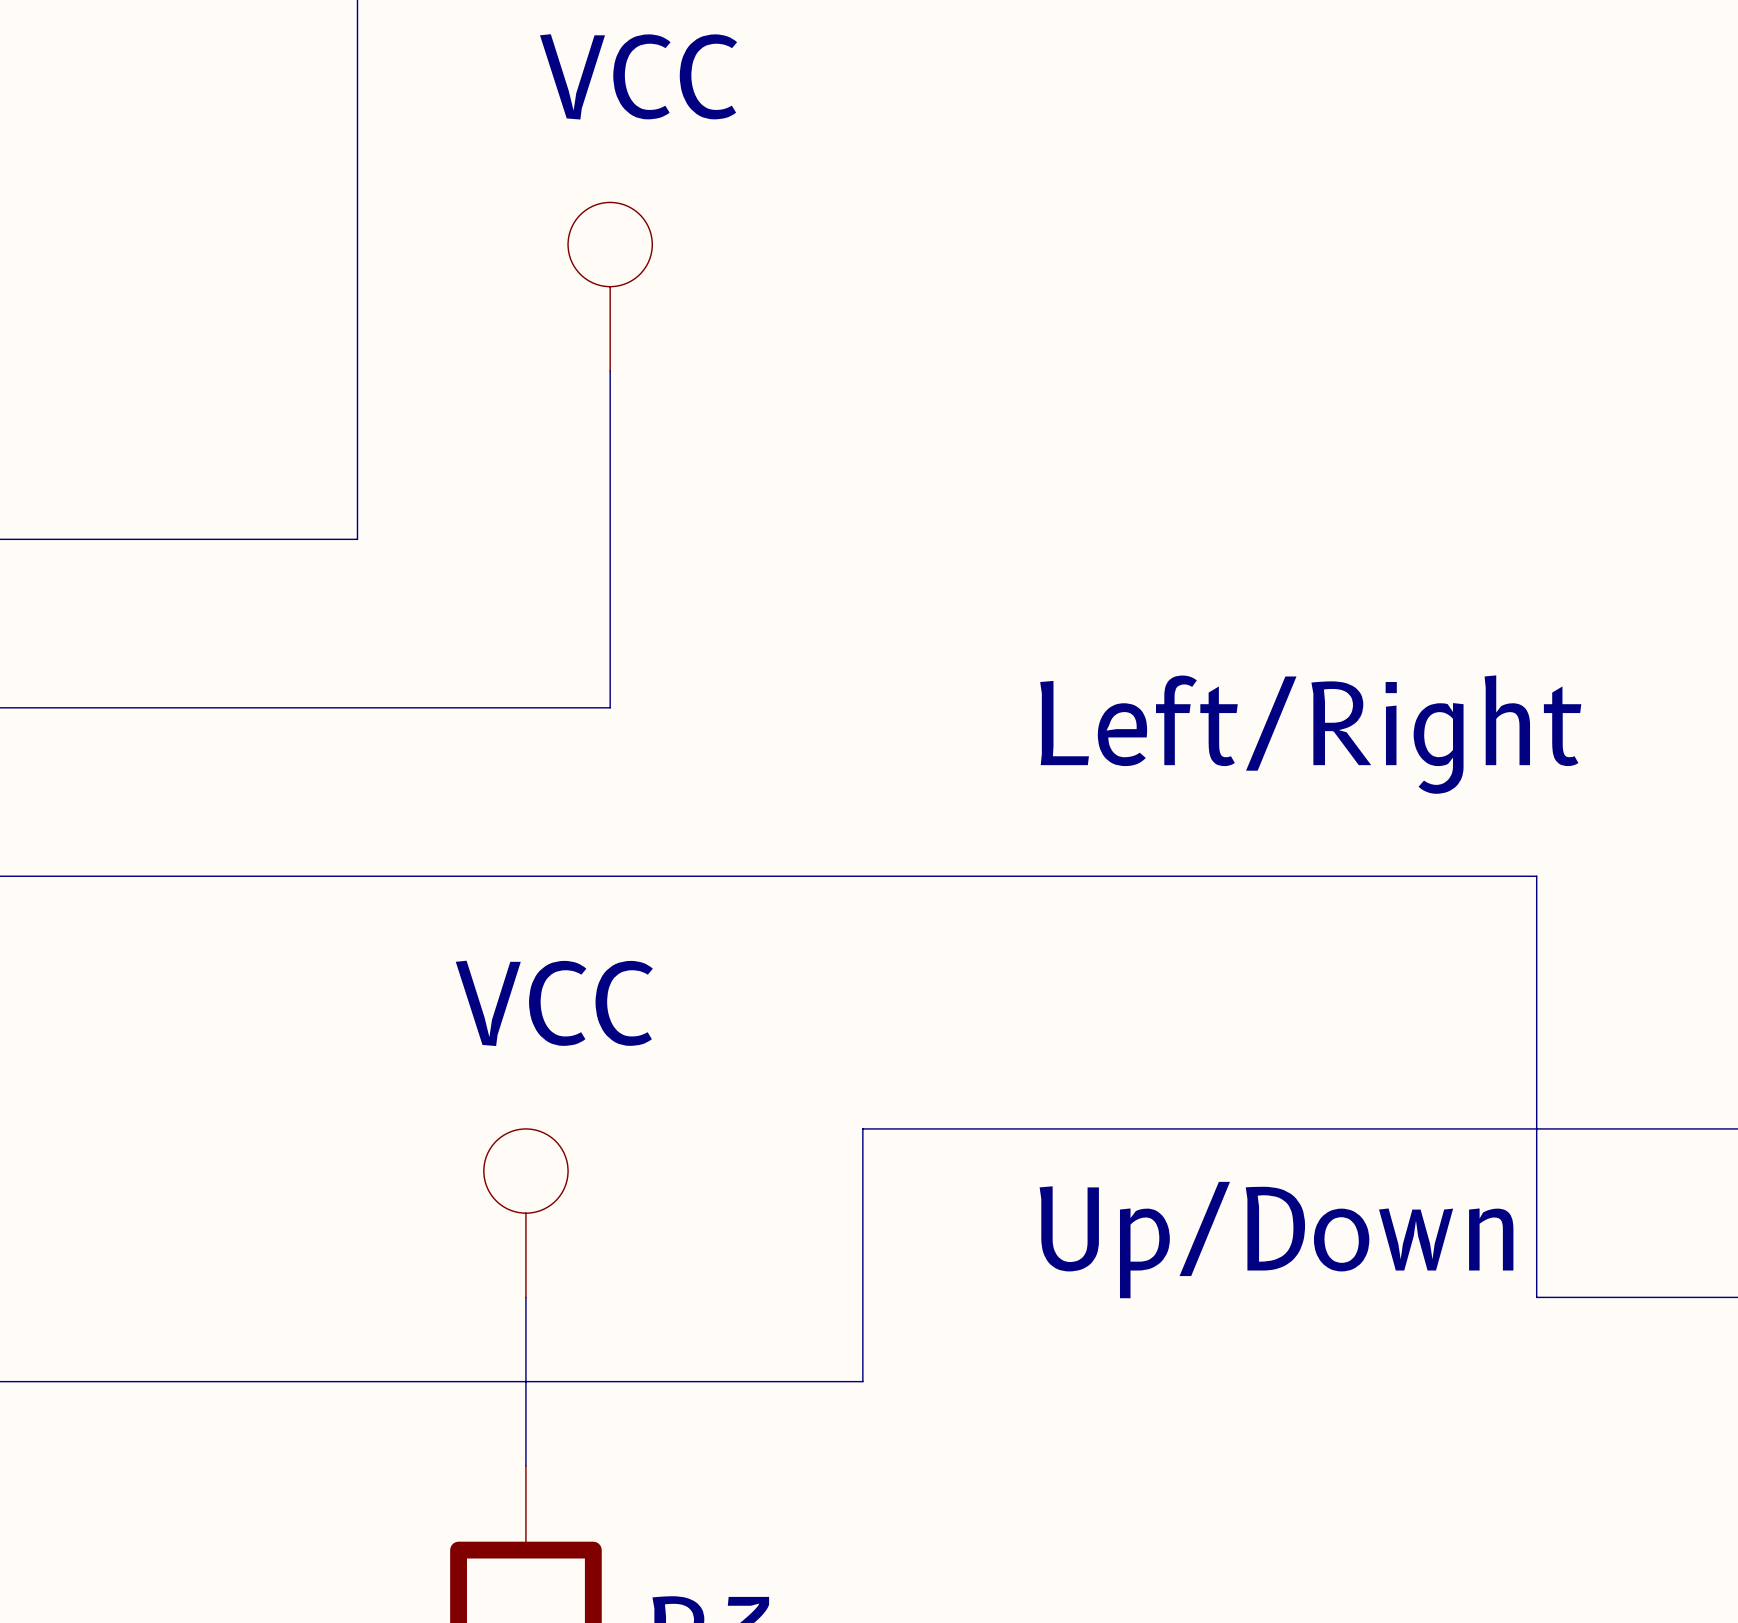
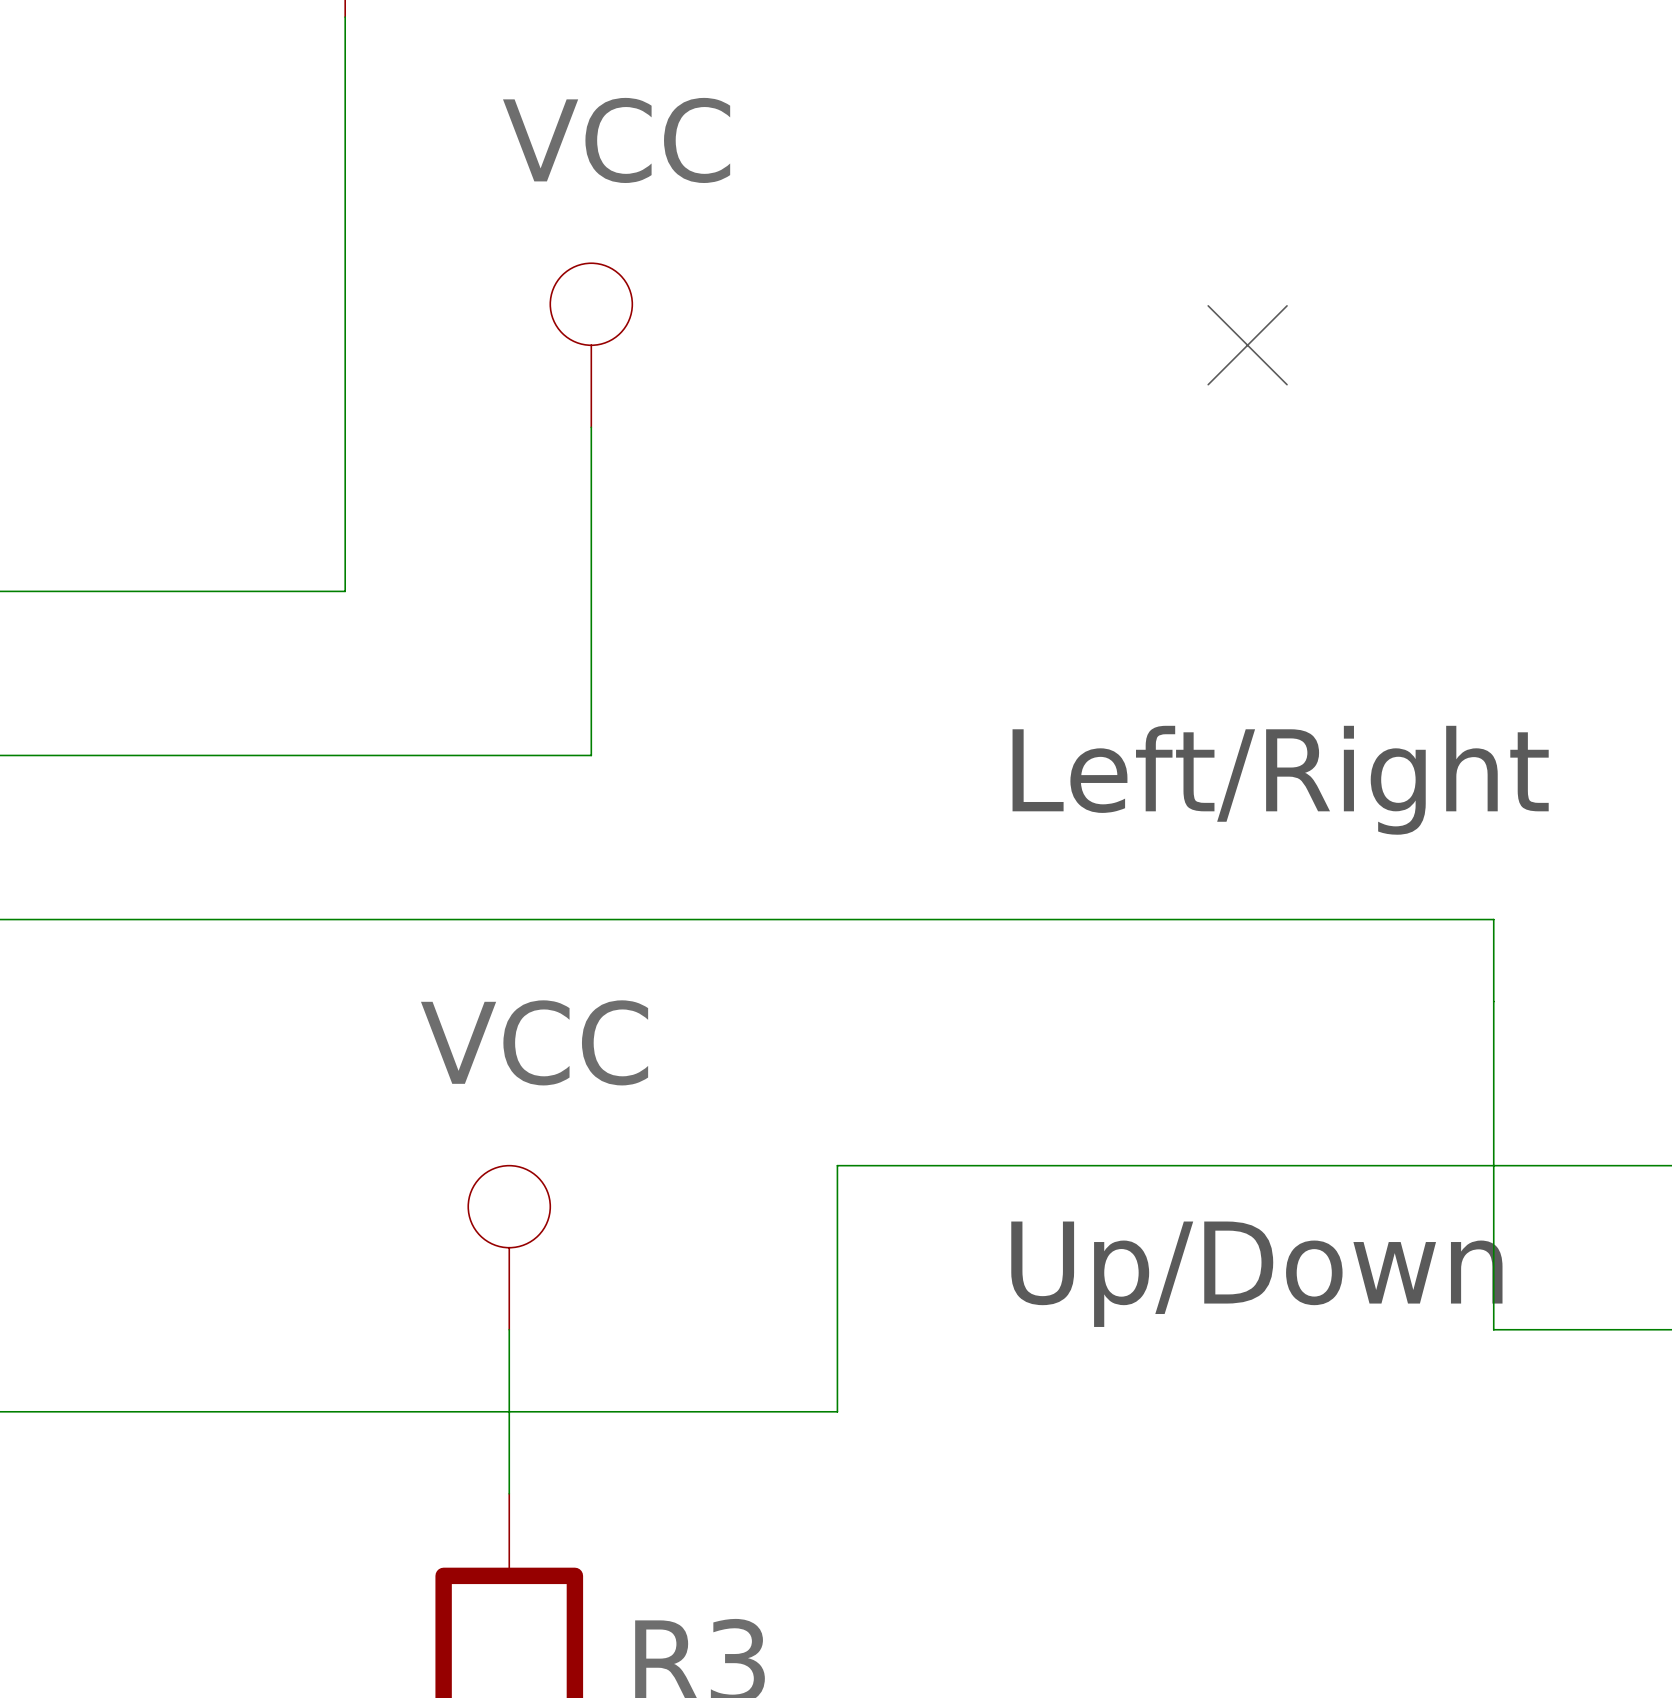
no-connect mark: none -> (1247, 345)

